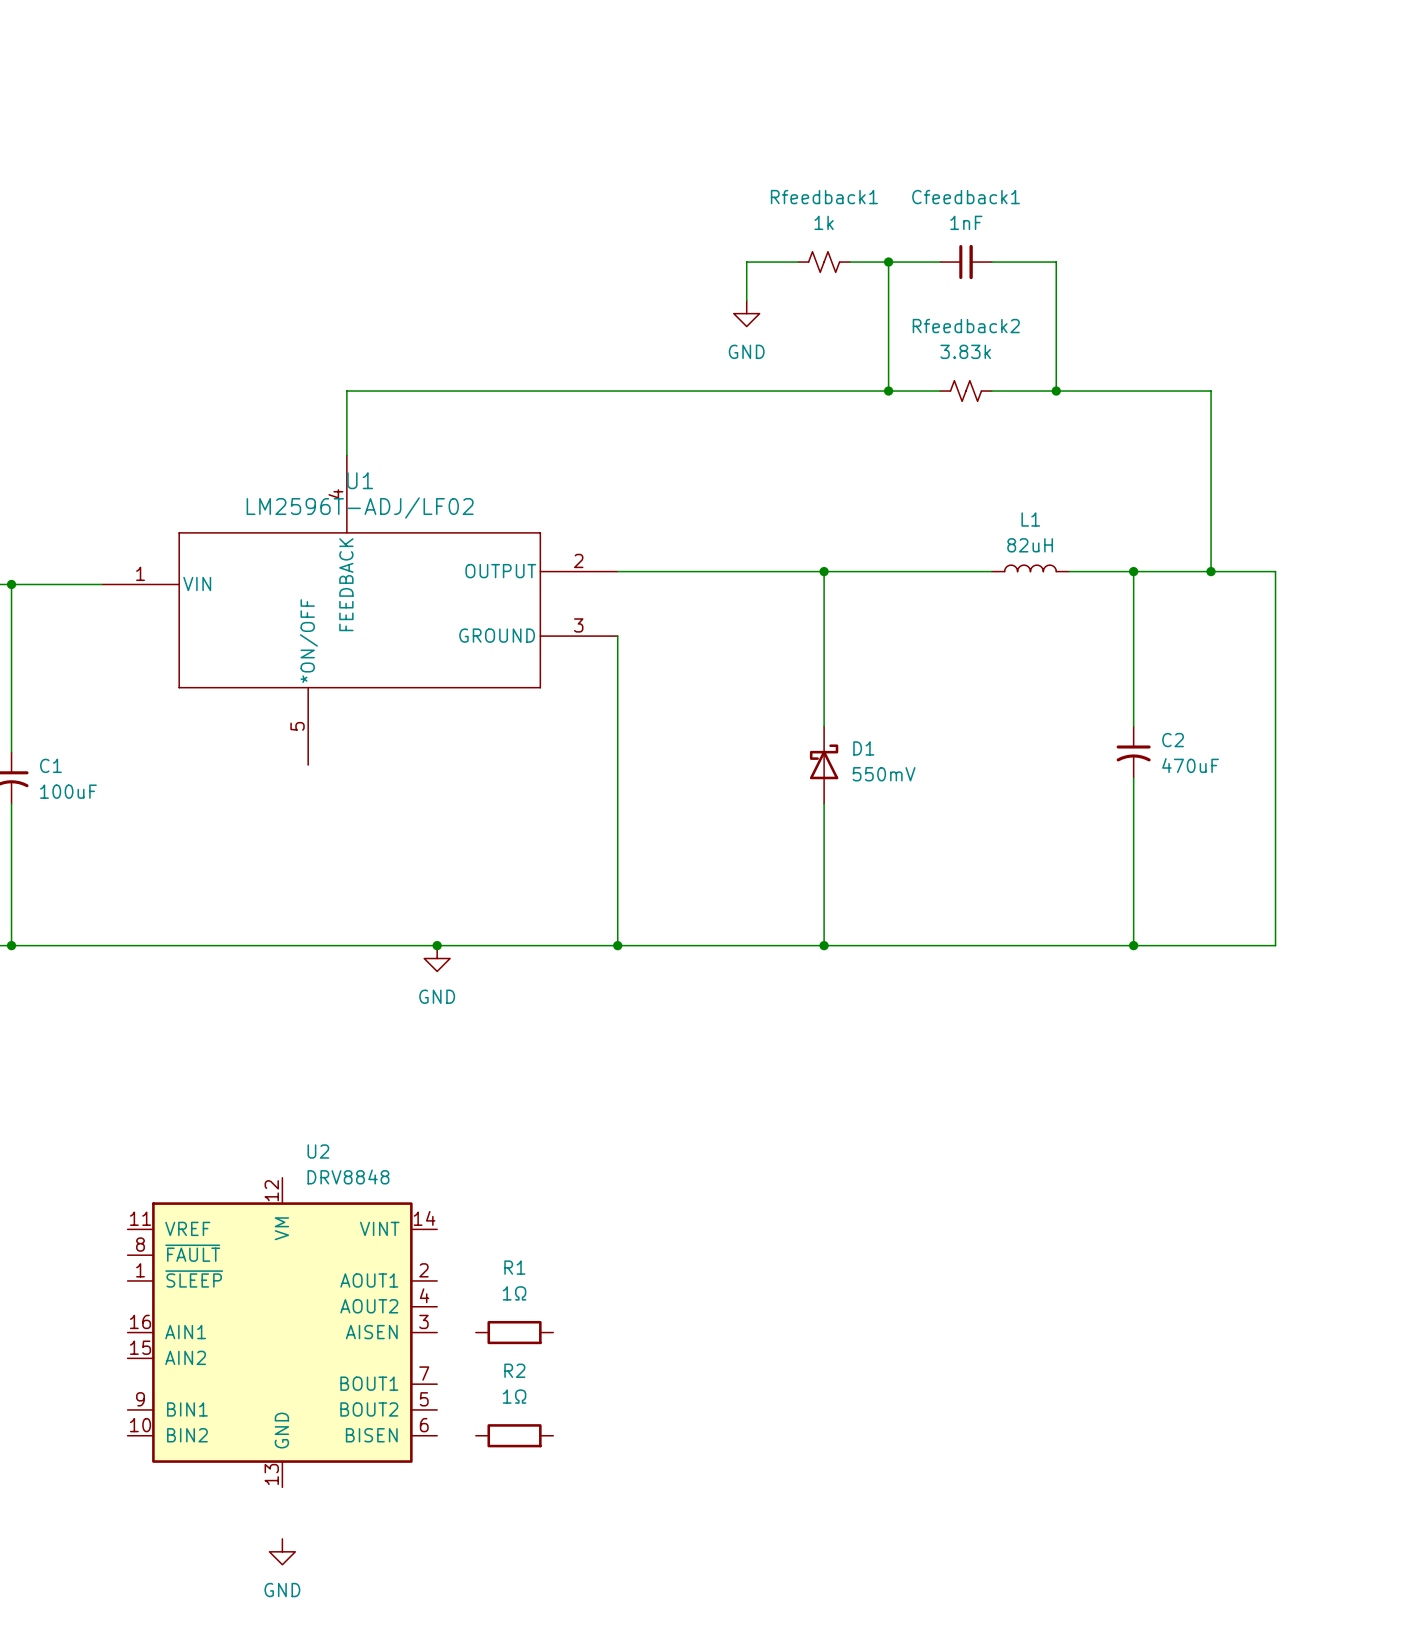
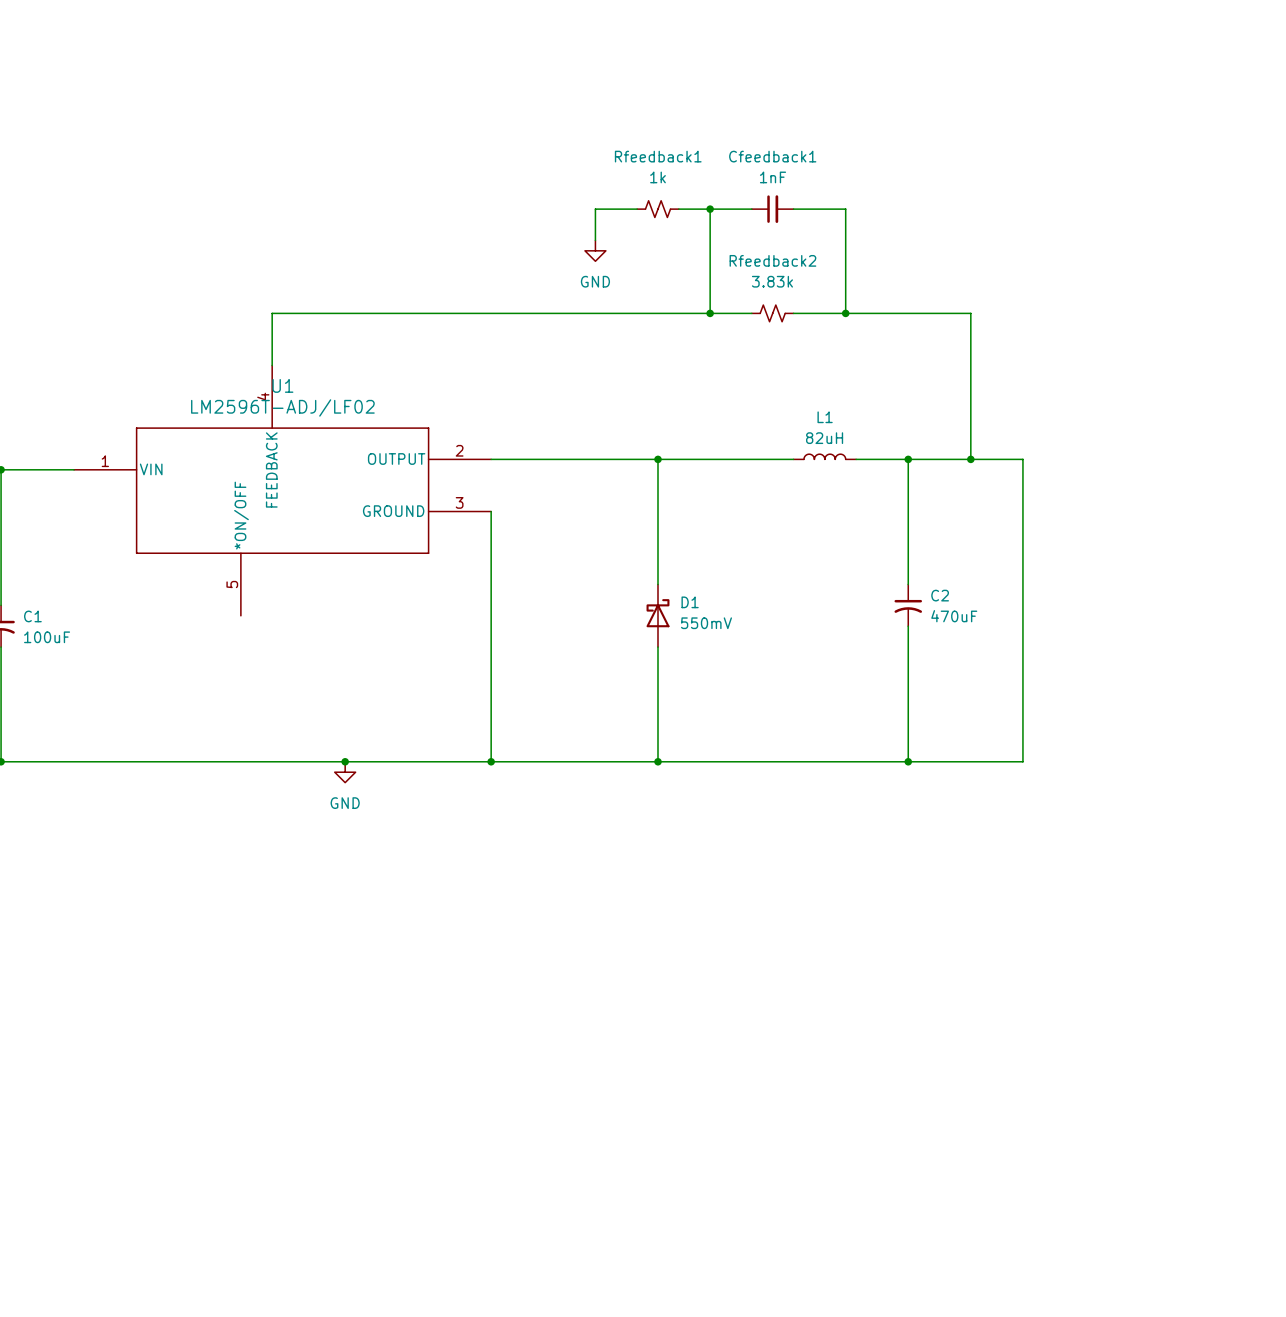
U2: DRV8848 (282, 1332) -> none
R1: 1Ω (514, 1332) -> none
R2: 1Ω (514, 1435) -> none
power symbol: GND (282, 1551) -> none

